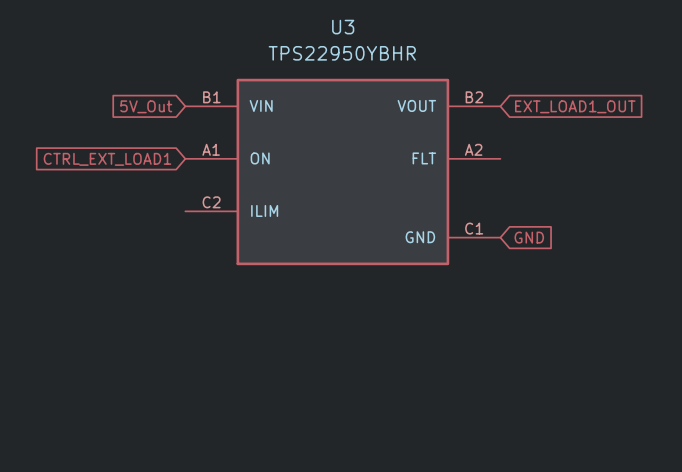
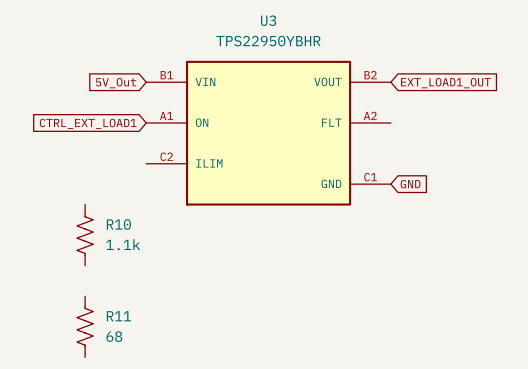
R10: none -> 1.1k (85, 235)
R11: none -> 68 (85, 326)

